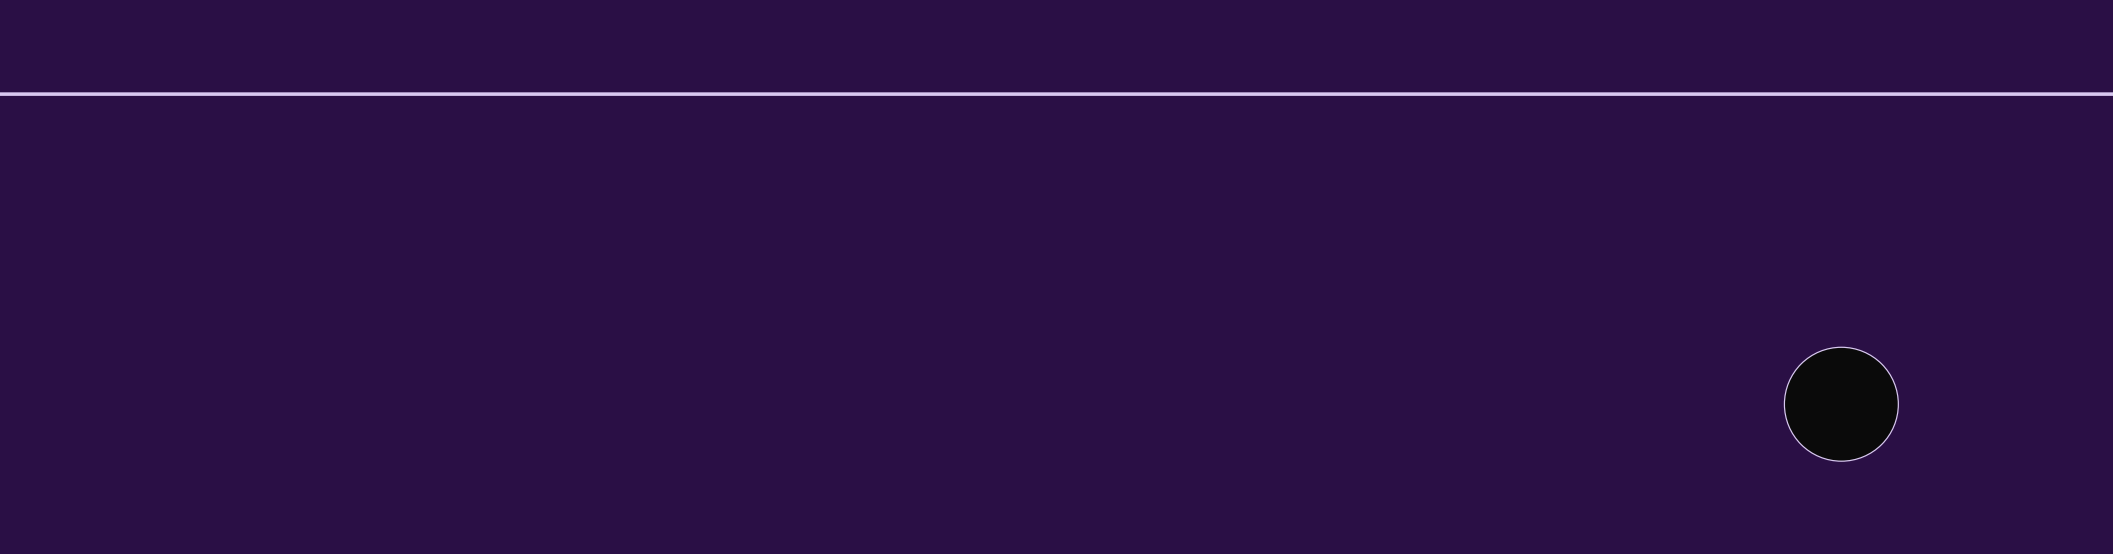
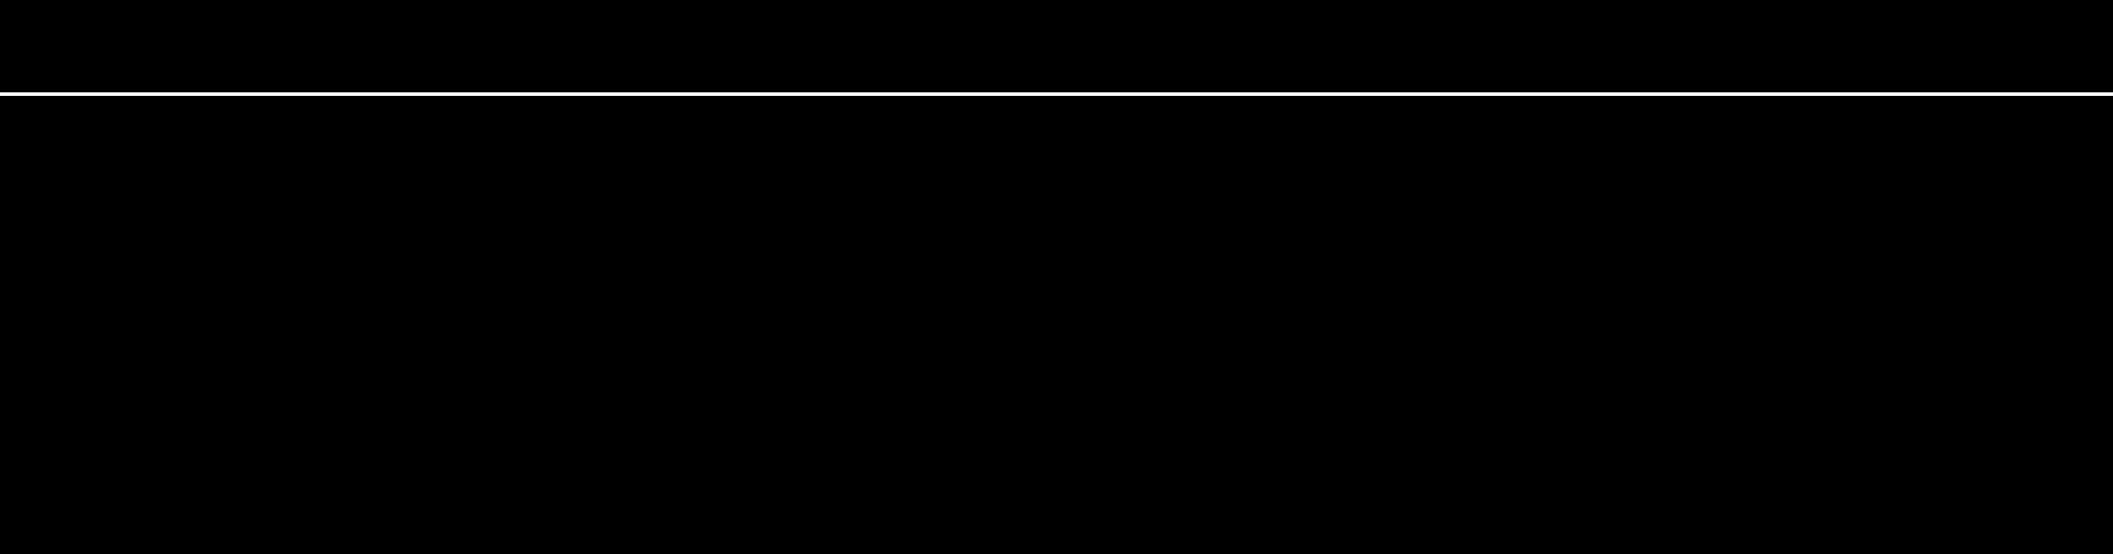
part: (1841, 404) -> none

